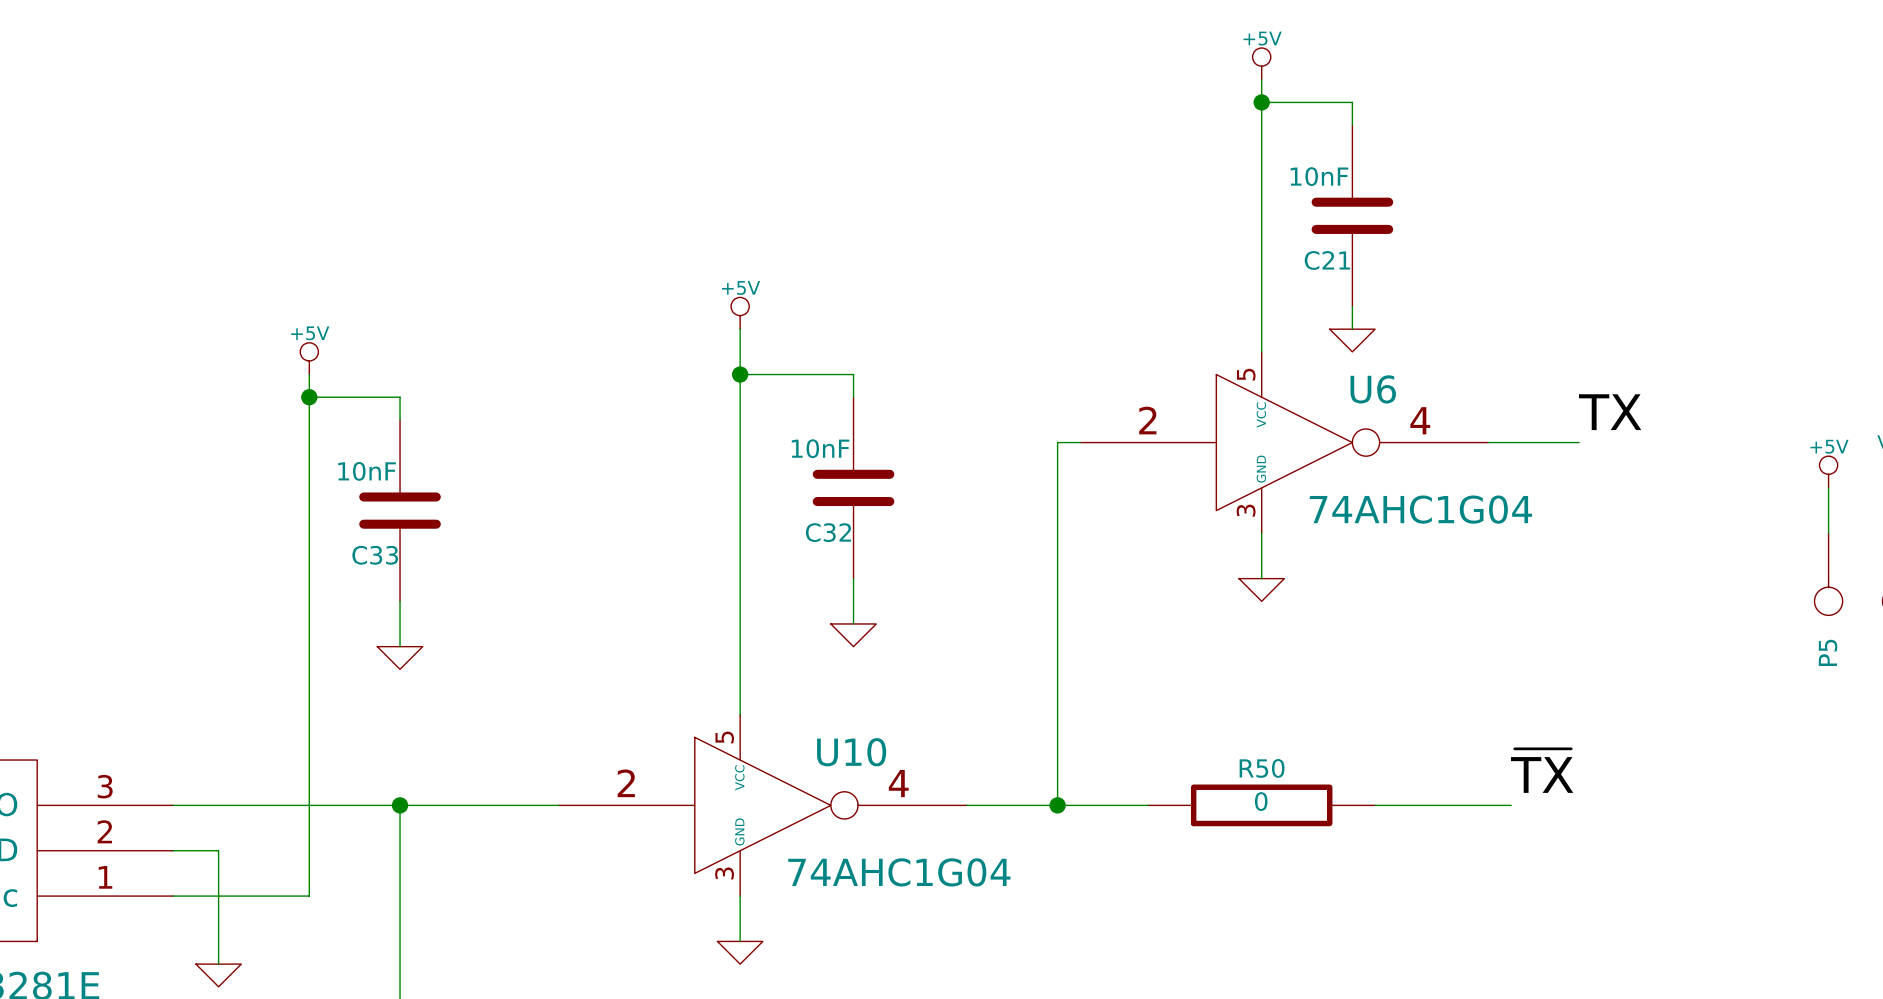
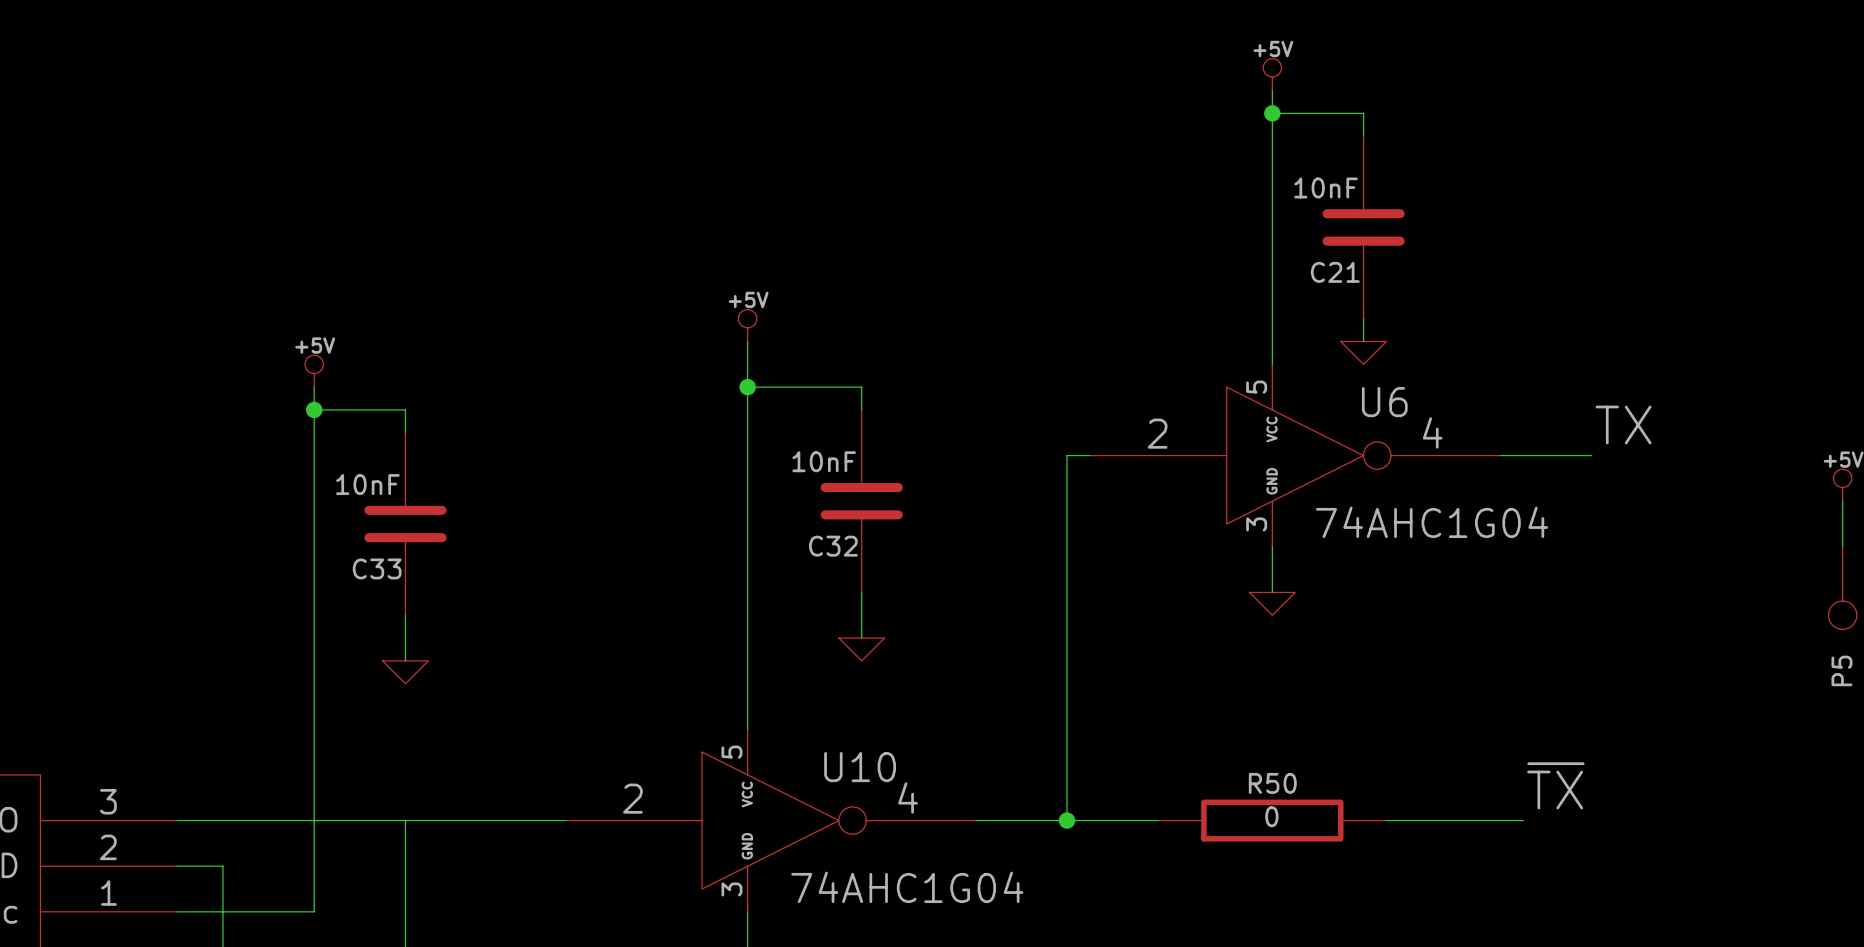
junction: (400, 805) -> none

